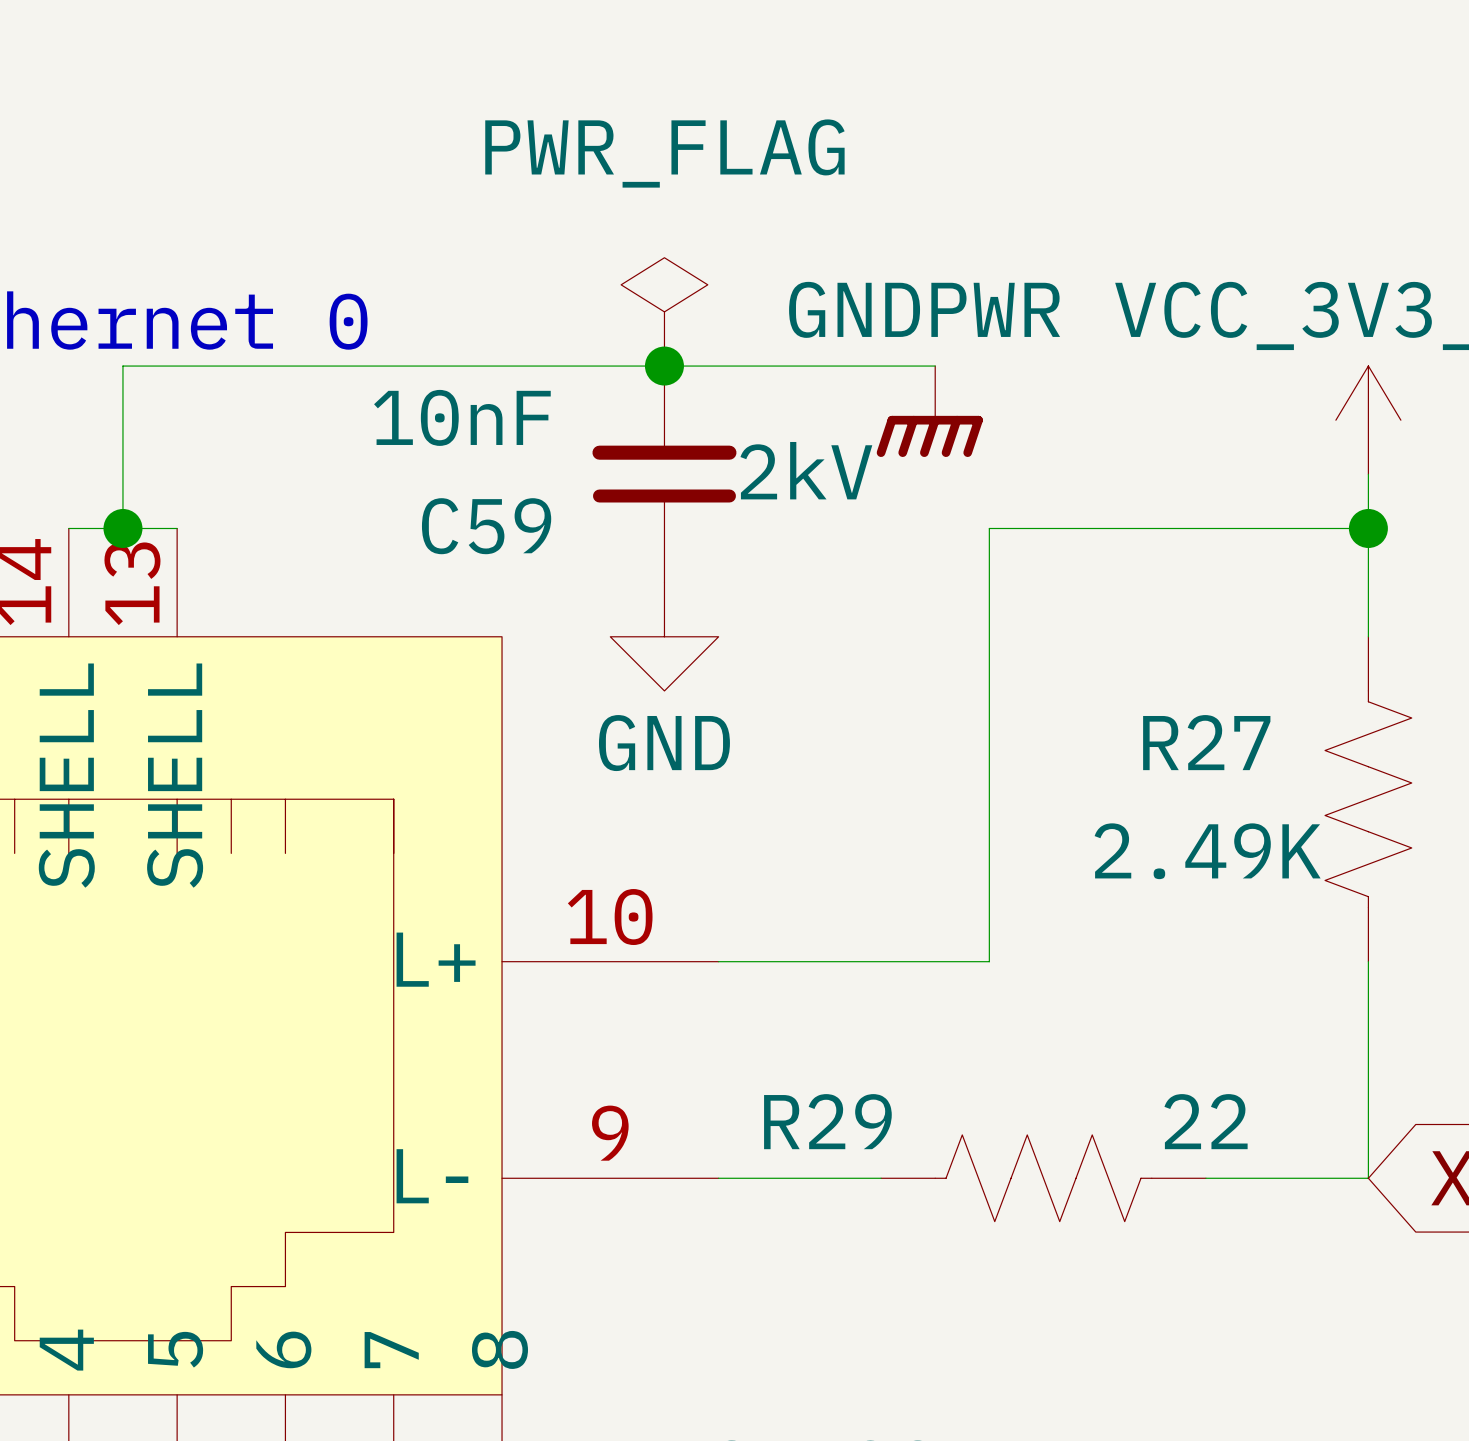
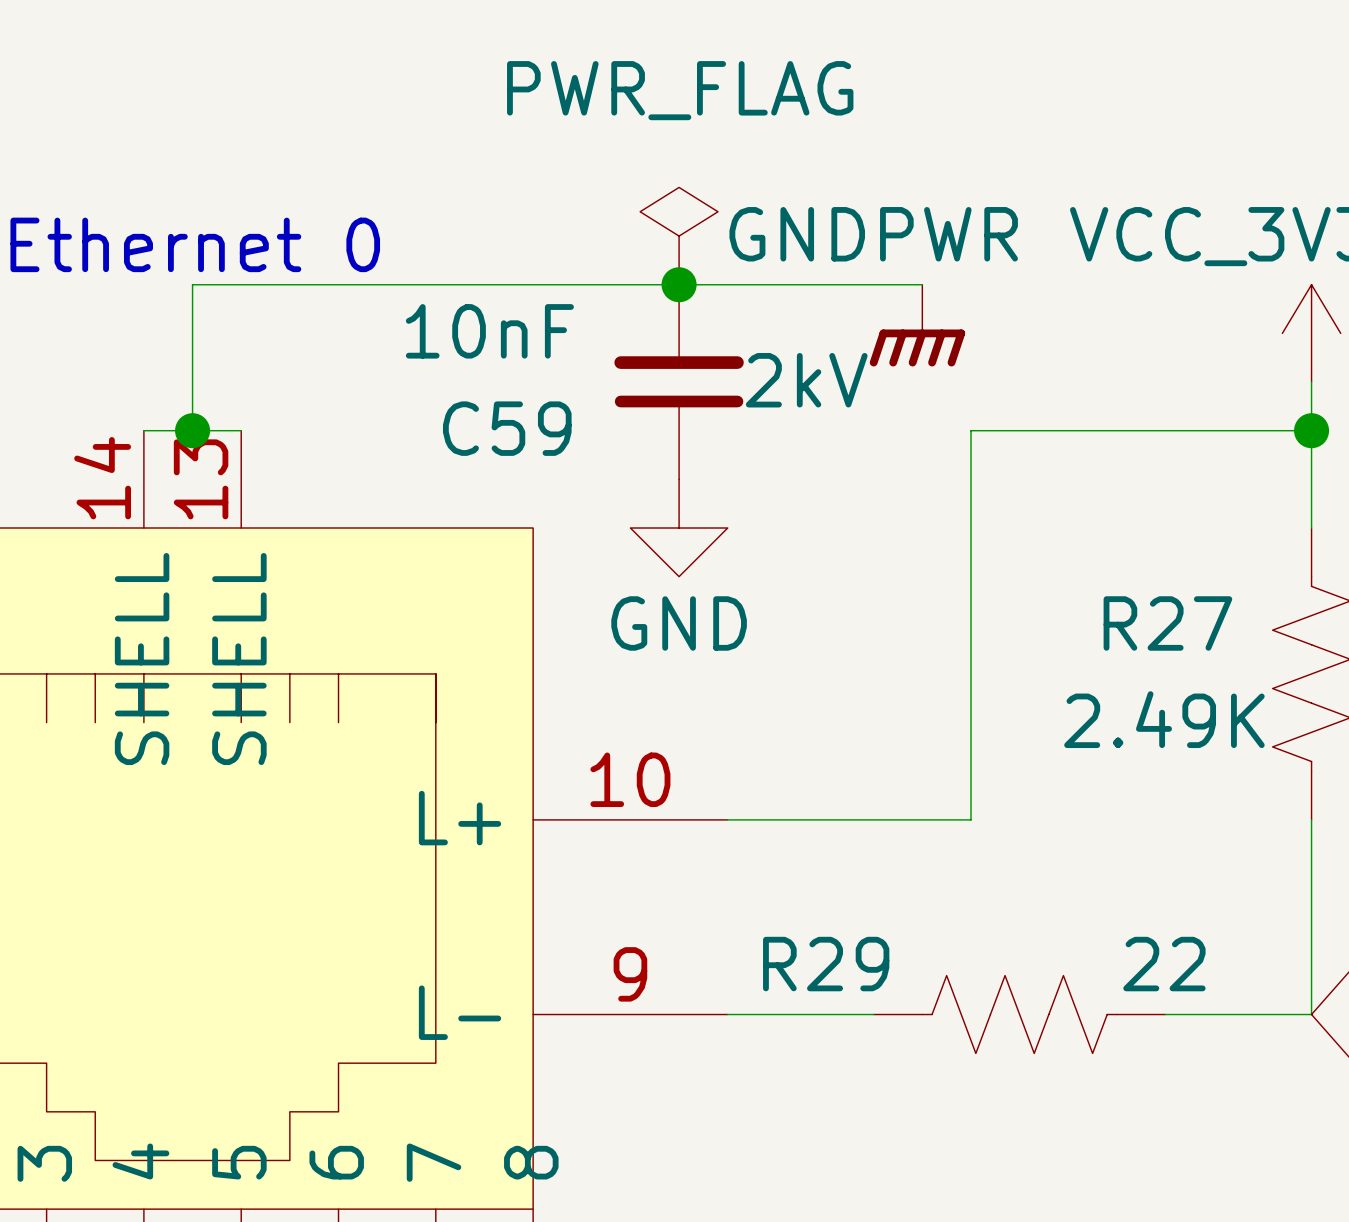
power symbol text position: GNDPWR (924, 309) -> GNDPWR (873, 234)

